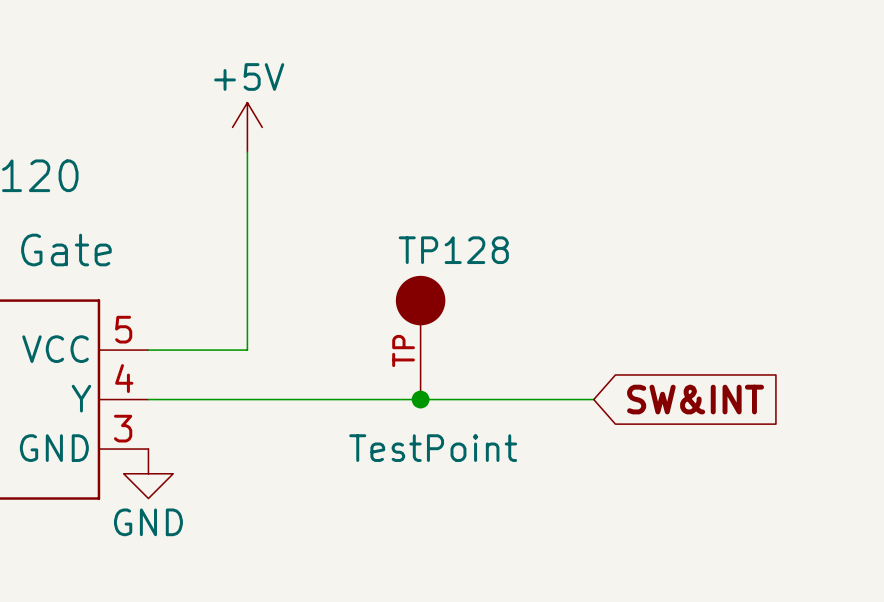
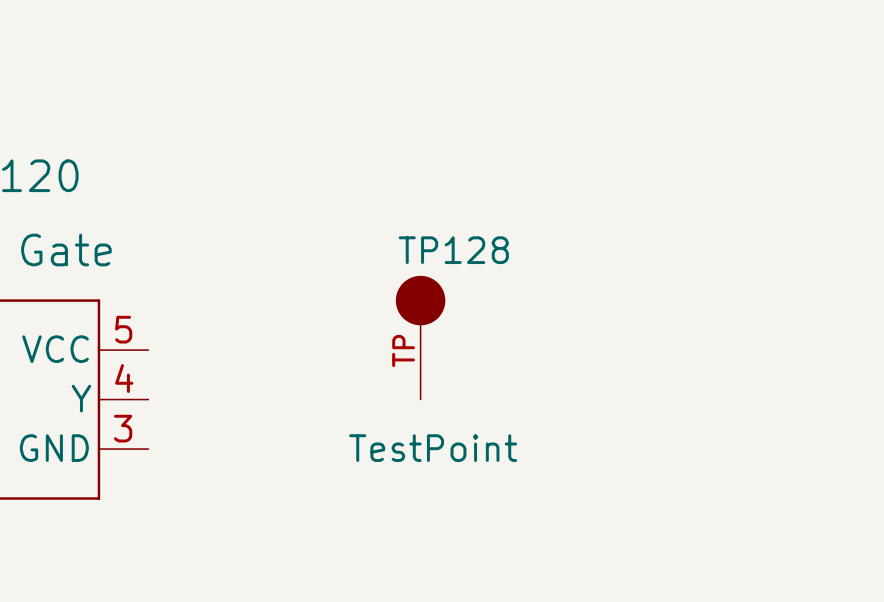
power symbol: +5V (247, 127) -> none
wire: (247, 152) (247, 350) (148, 350) -> none
wire: (148, 399) (593, 399) -> none
junction: (420, 399) -> none
global label: SW&INT (695, 399) -> none
power symbol: GND (148, 473) -> none

